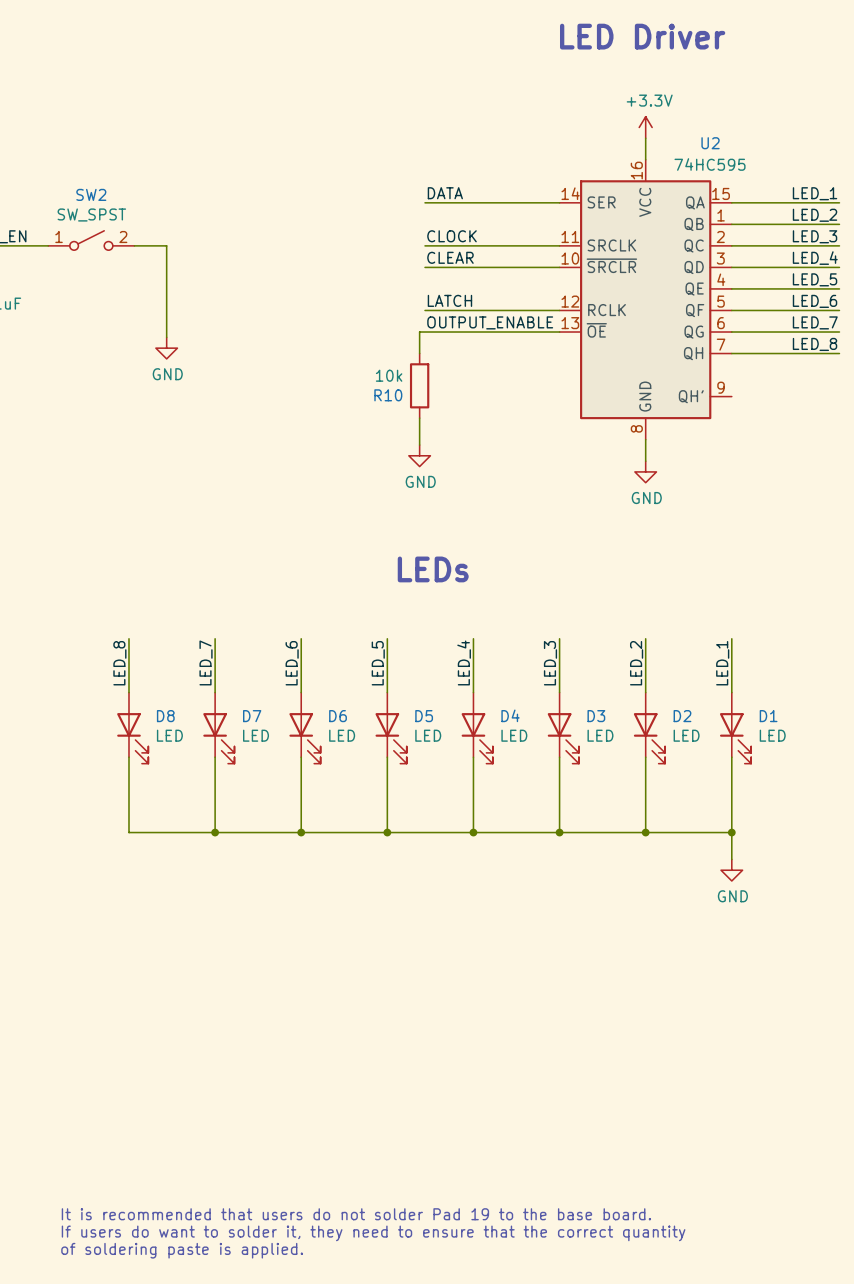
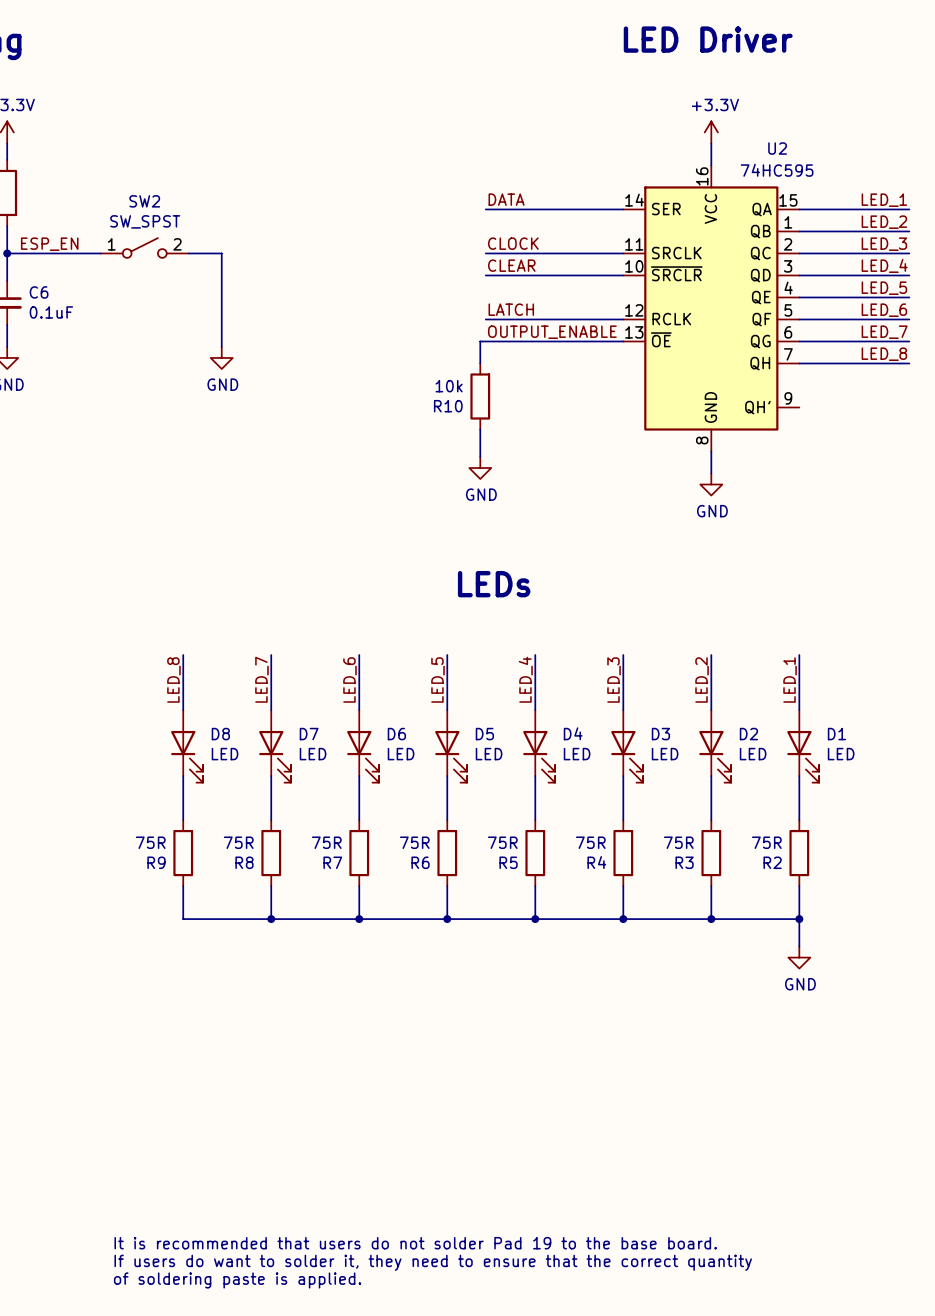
wire: (128, 800) (128, 832) (731, 832) -> (183, 886) (183, 919) (799, 919)
wire: (215, 800) (215, 832) -> (271, 886) (271, 919)
wire: (301, 800) (301, 832) -> (359, 886) (359, 919)
wire: (387, 800) (387, 832) -> (447, 886) (447, 919)
wire: (473, 800) (473, 832) -> (535, 886) (535, 919)
wire: (559, 800) (559, 832) -> (623, 886) (623, 919)
wire: (645, 800) (645, 832) -> (711, 886) (711, 919)
wire: (731, 800) (731, 859) -> (799, 886) (799, 946)
R9: none -> 75R (183, 853)
junction: (215, 832) -> none
R8: none -> 75R (271, 853)
junction: (301, 832) -> none
R7: none -> 75R (359, 853)
junction: (387, 832) -> none
R6: none -> 75R (447, 853)
junction: (473, 832) -> none
R5: none -> 75R (535, 853)
junction: (559, 832) -> none
R4: none -> 75R (623, 853)
junction: (645, 832) -> none
R3: none -> 75R (711, 853)
junction: (731, 832) -> none
R2: none -> 75R (799, 853)
power symbol position: GND (731, 870) -> GND (799, 957)
junction: none -> (271, 919)
junction: none -> (359, 919)
junction: none -> (447, 919)
junction: none -> (535, 919)
junction: none -> (623, 919)
junction: none -> (711, 919)
junction: none -> (799, 919)

